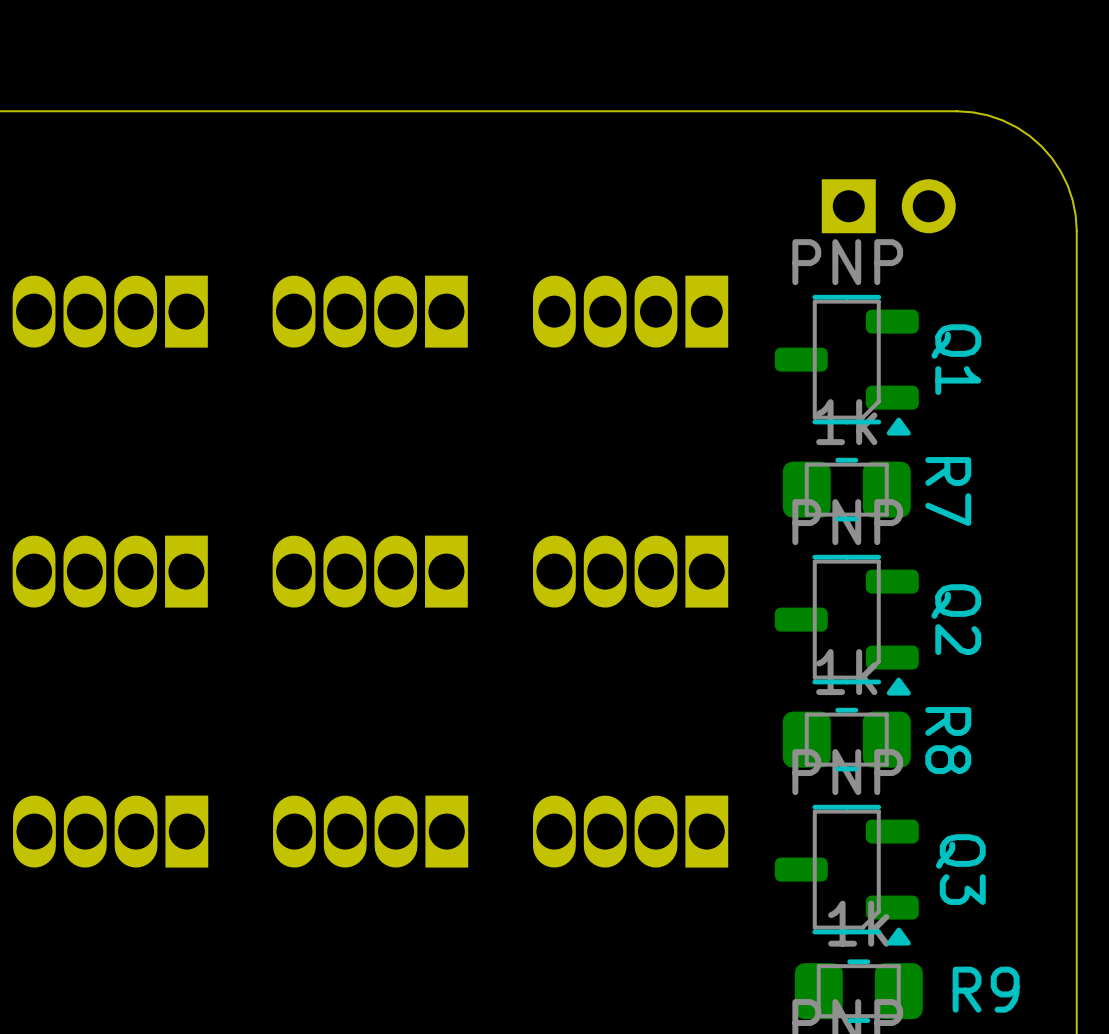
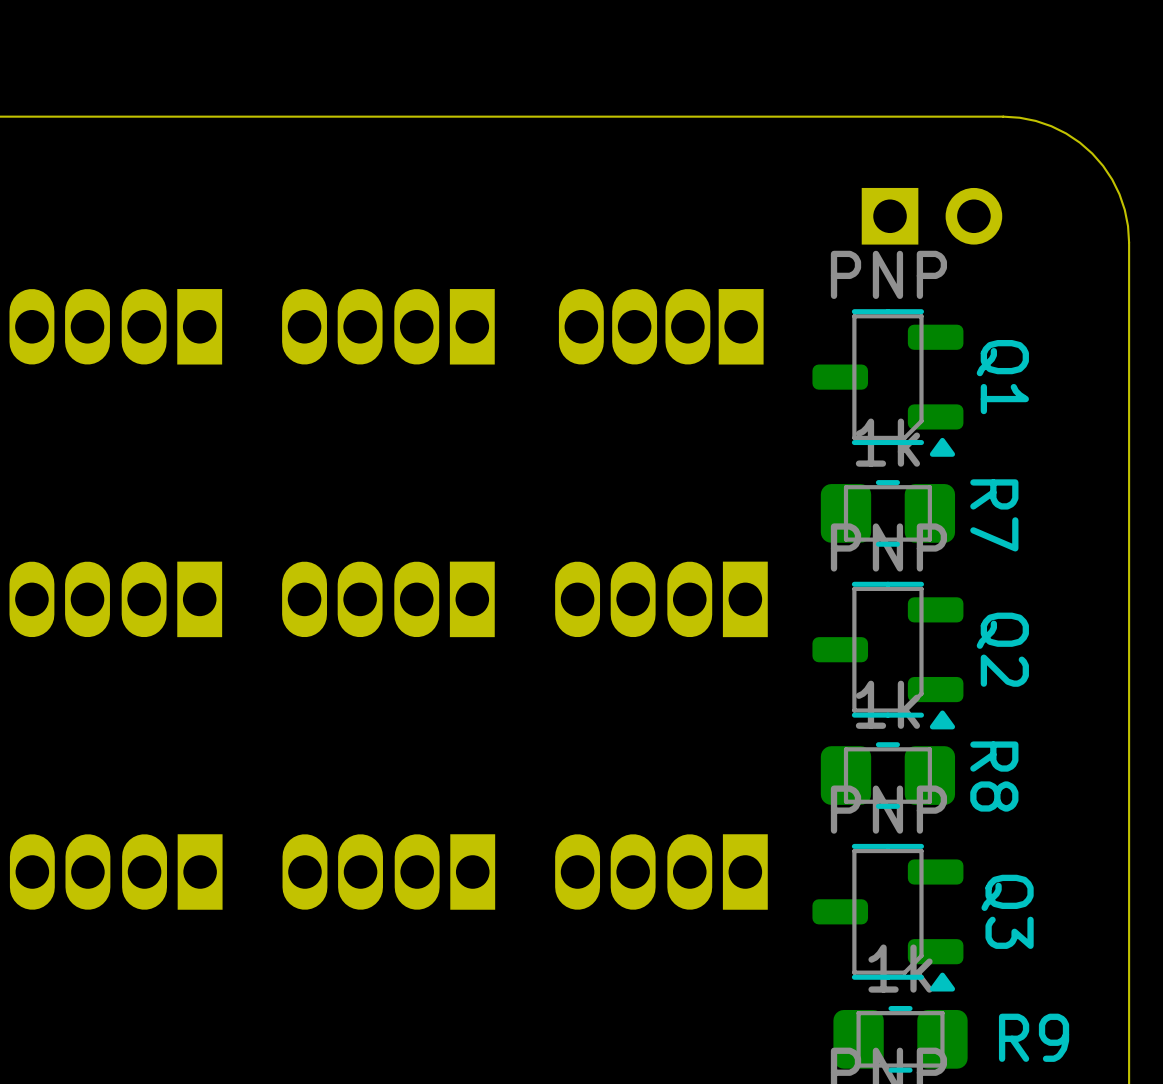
part footprint: [12, 275, 208, 348] -> [9, 289, 223, 365]
part footprint: [272, 275, 468, 348] -> [282, 289, 495, 365]
part footprint: [12, 535, 208, 608] -> [9, 561, 223, 638]
part footprint: [272, 535, 468, 608] -> [282, 561, 495, 638]
part footprint: [533, 535, 729, 608] -> [555, 561, 768, 638]
part footprint: [13, 795, 209, 868] -> [9, 834, 223, 910]
part footprint: [273, 795, 469, 868] -> [282, 834, 496, 910]
part footprint: [533, 795, 729, 868] -> [555, 834, 768, 910]

